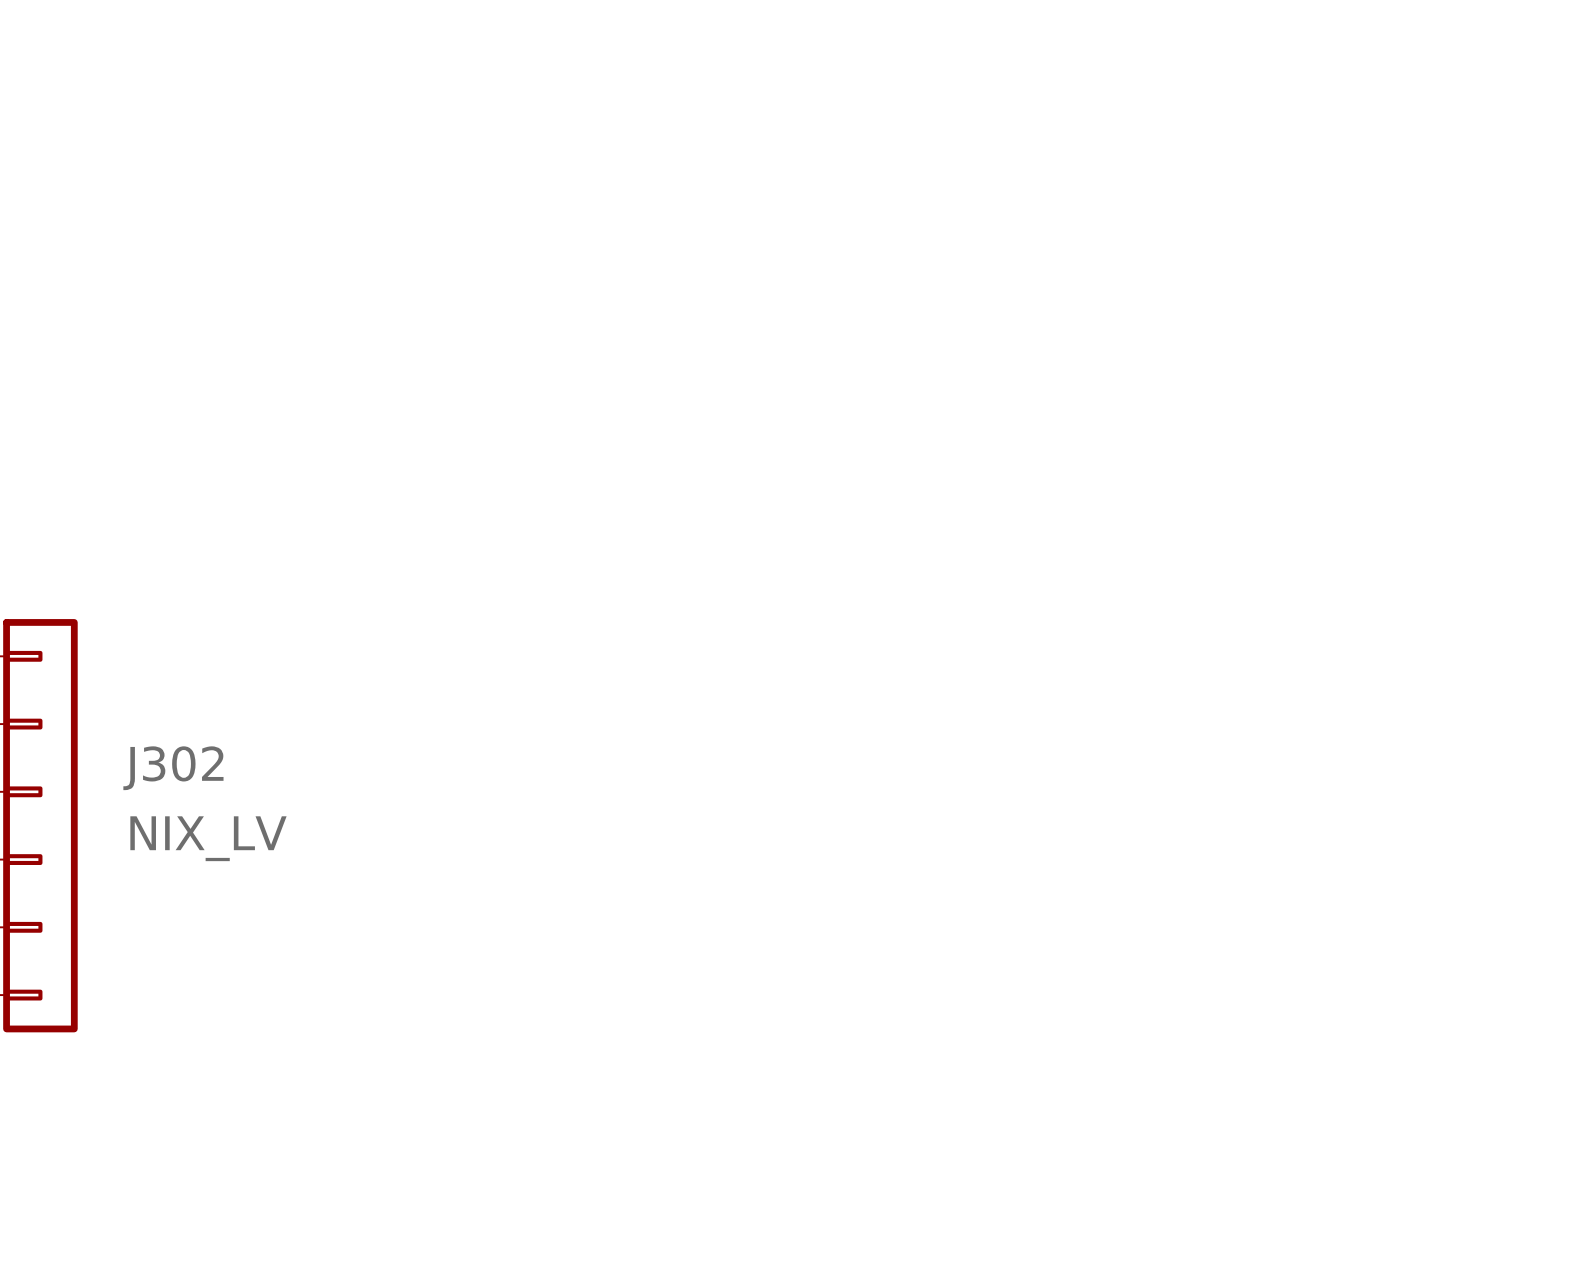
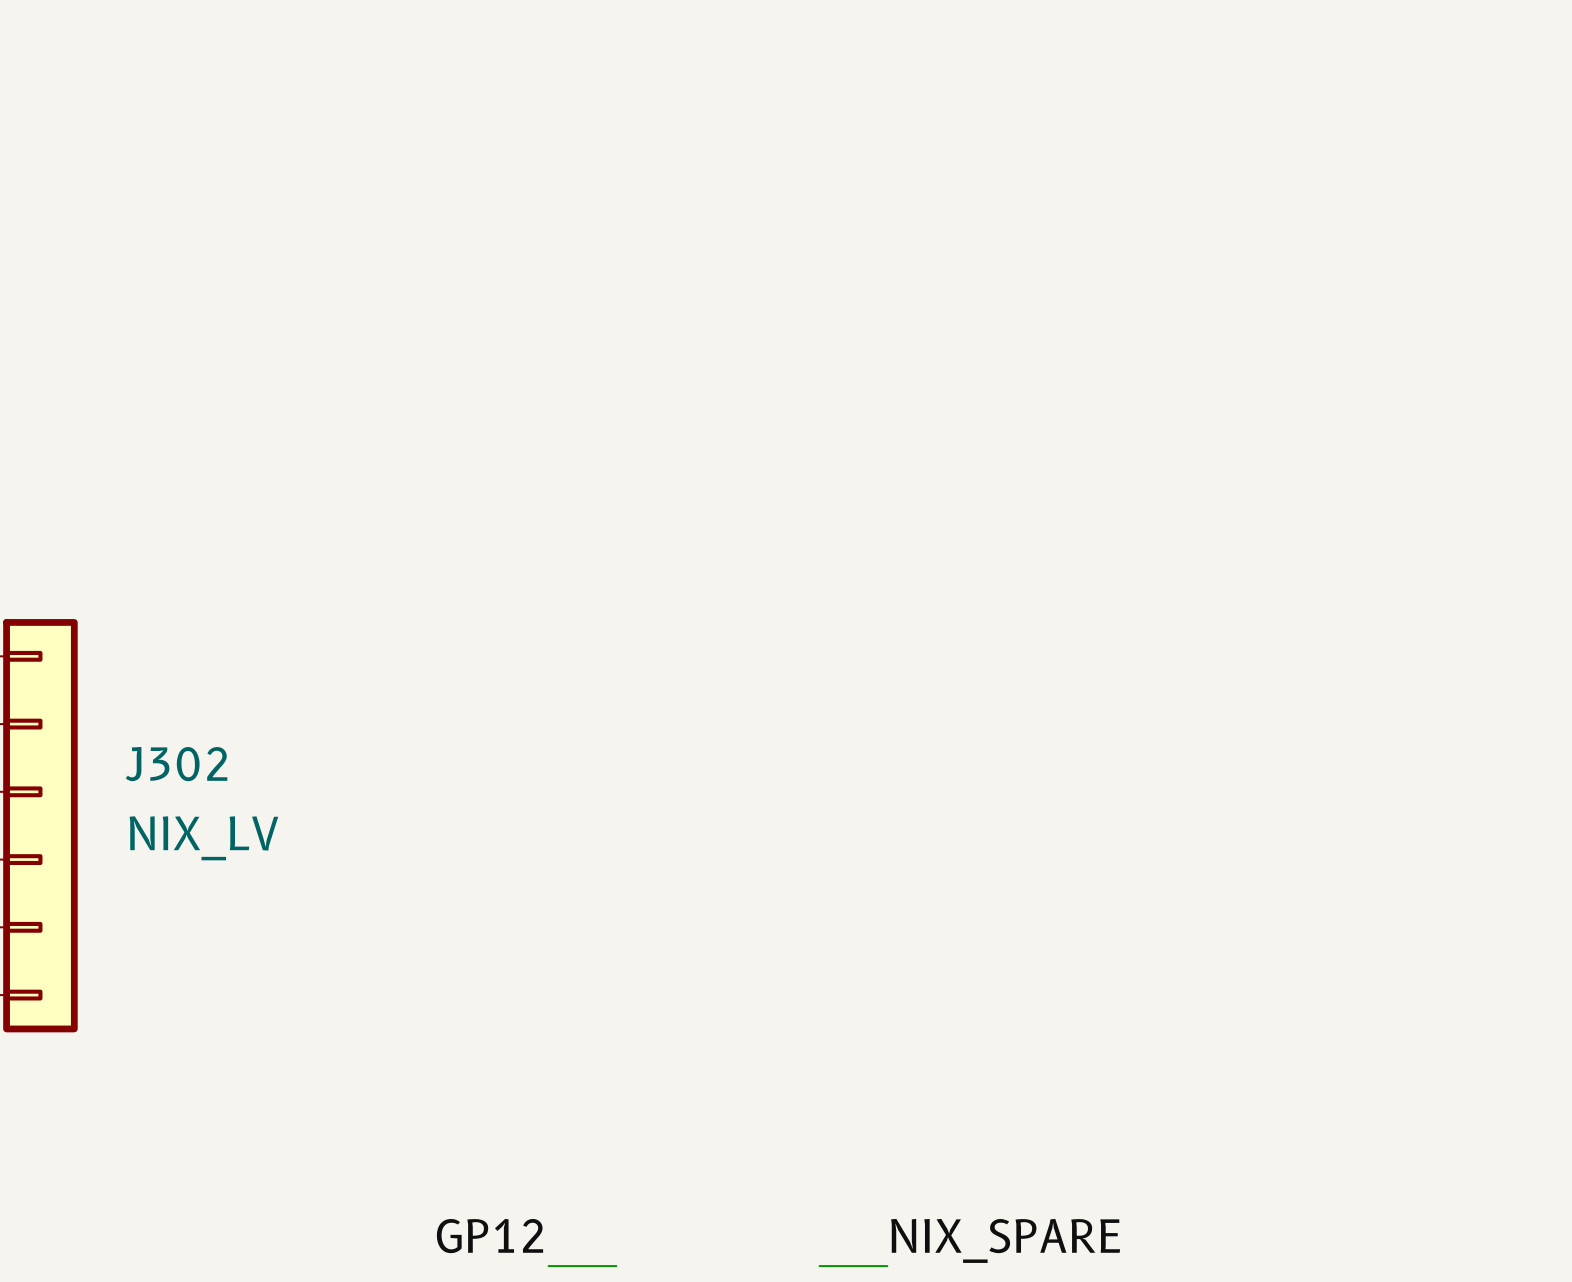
label: none -> GP12 (489, 1236)
label: none -> NIX_SPARE (1005, 1240)
wire: none -> (548, 1266) (616, 1266)
wire: none -> (819, 1266) (887, 1266)

